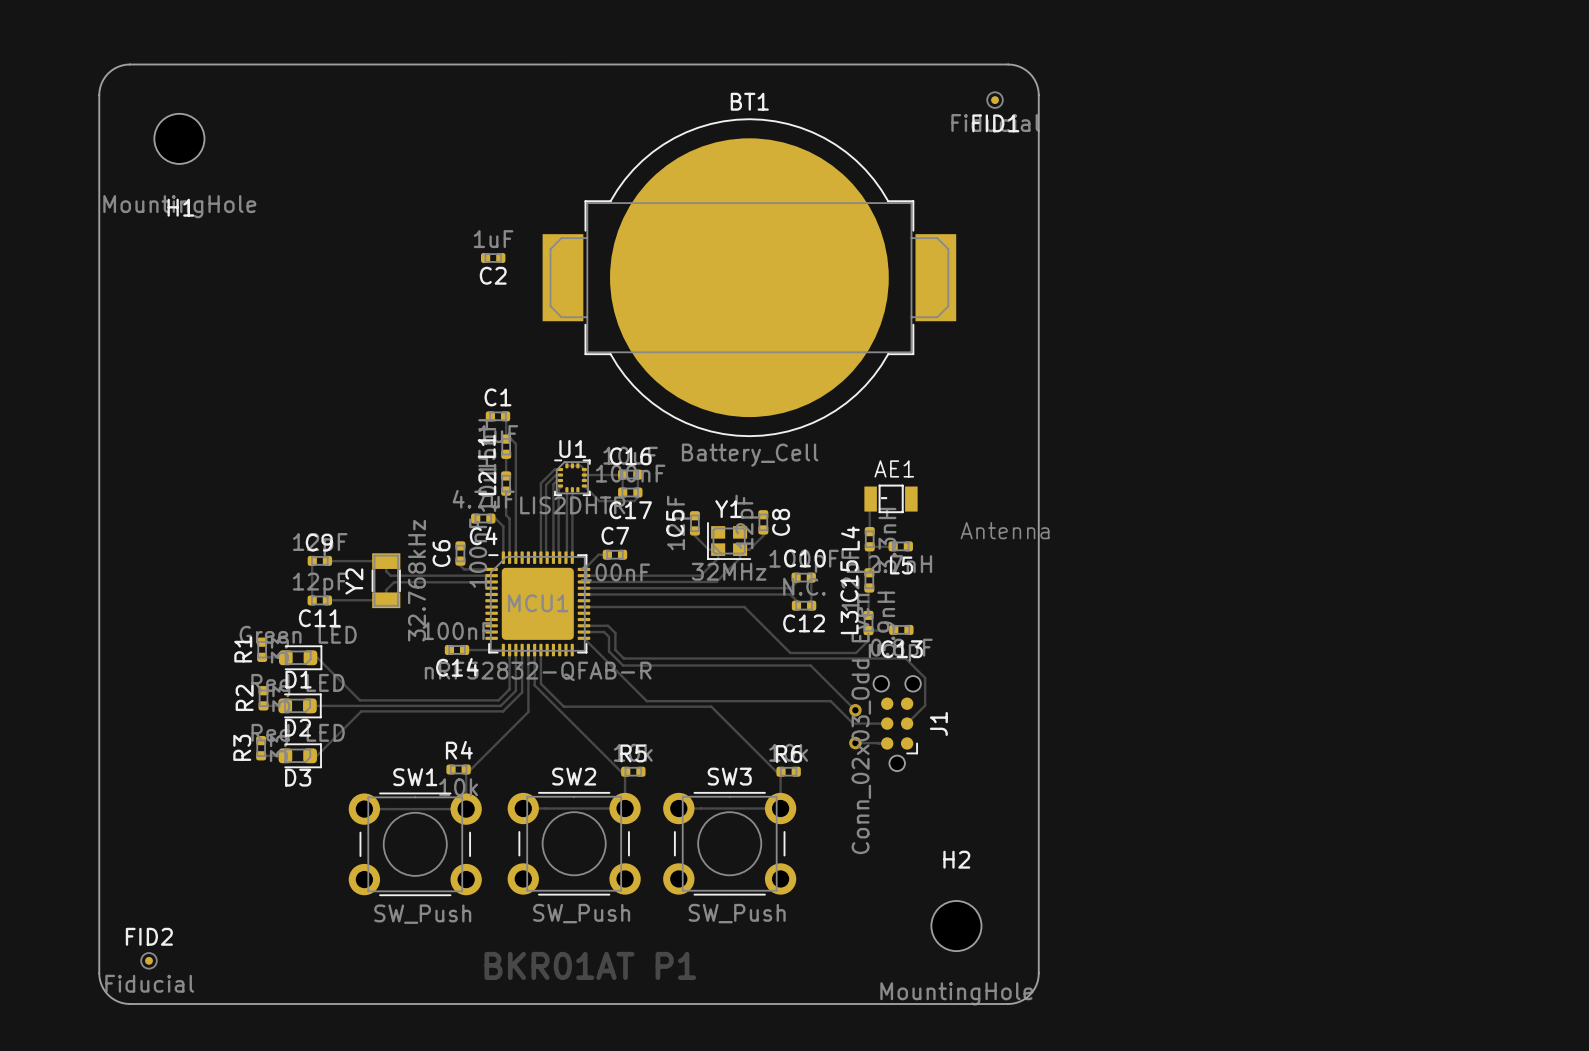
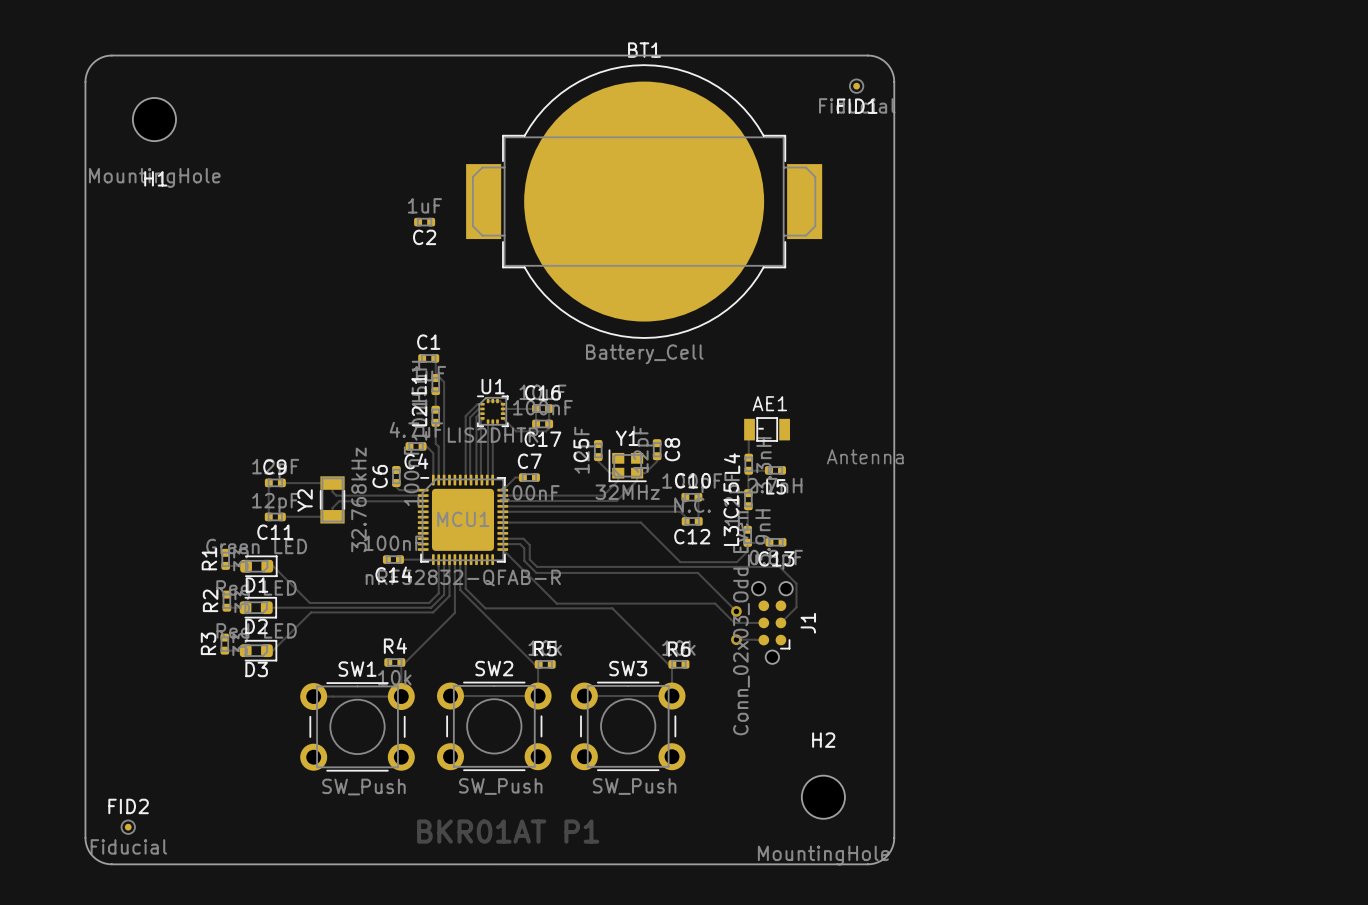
BT1 position: (749, 277) -> (644, 201)

